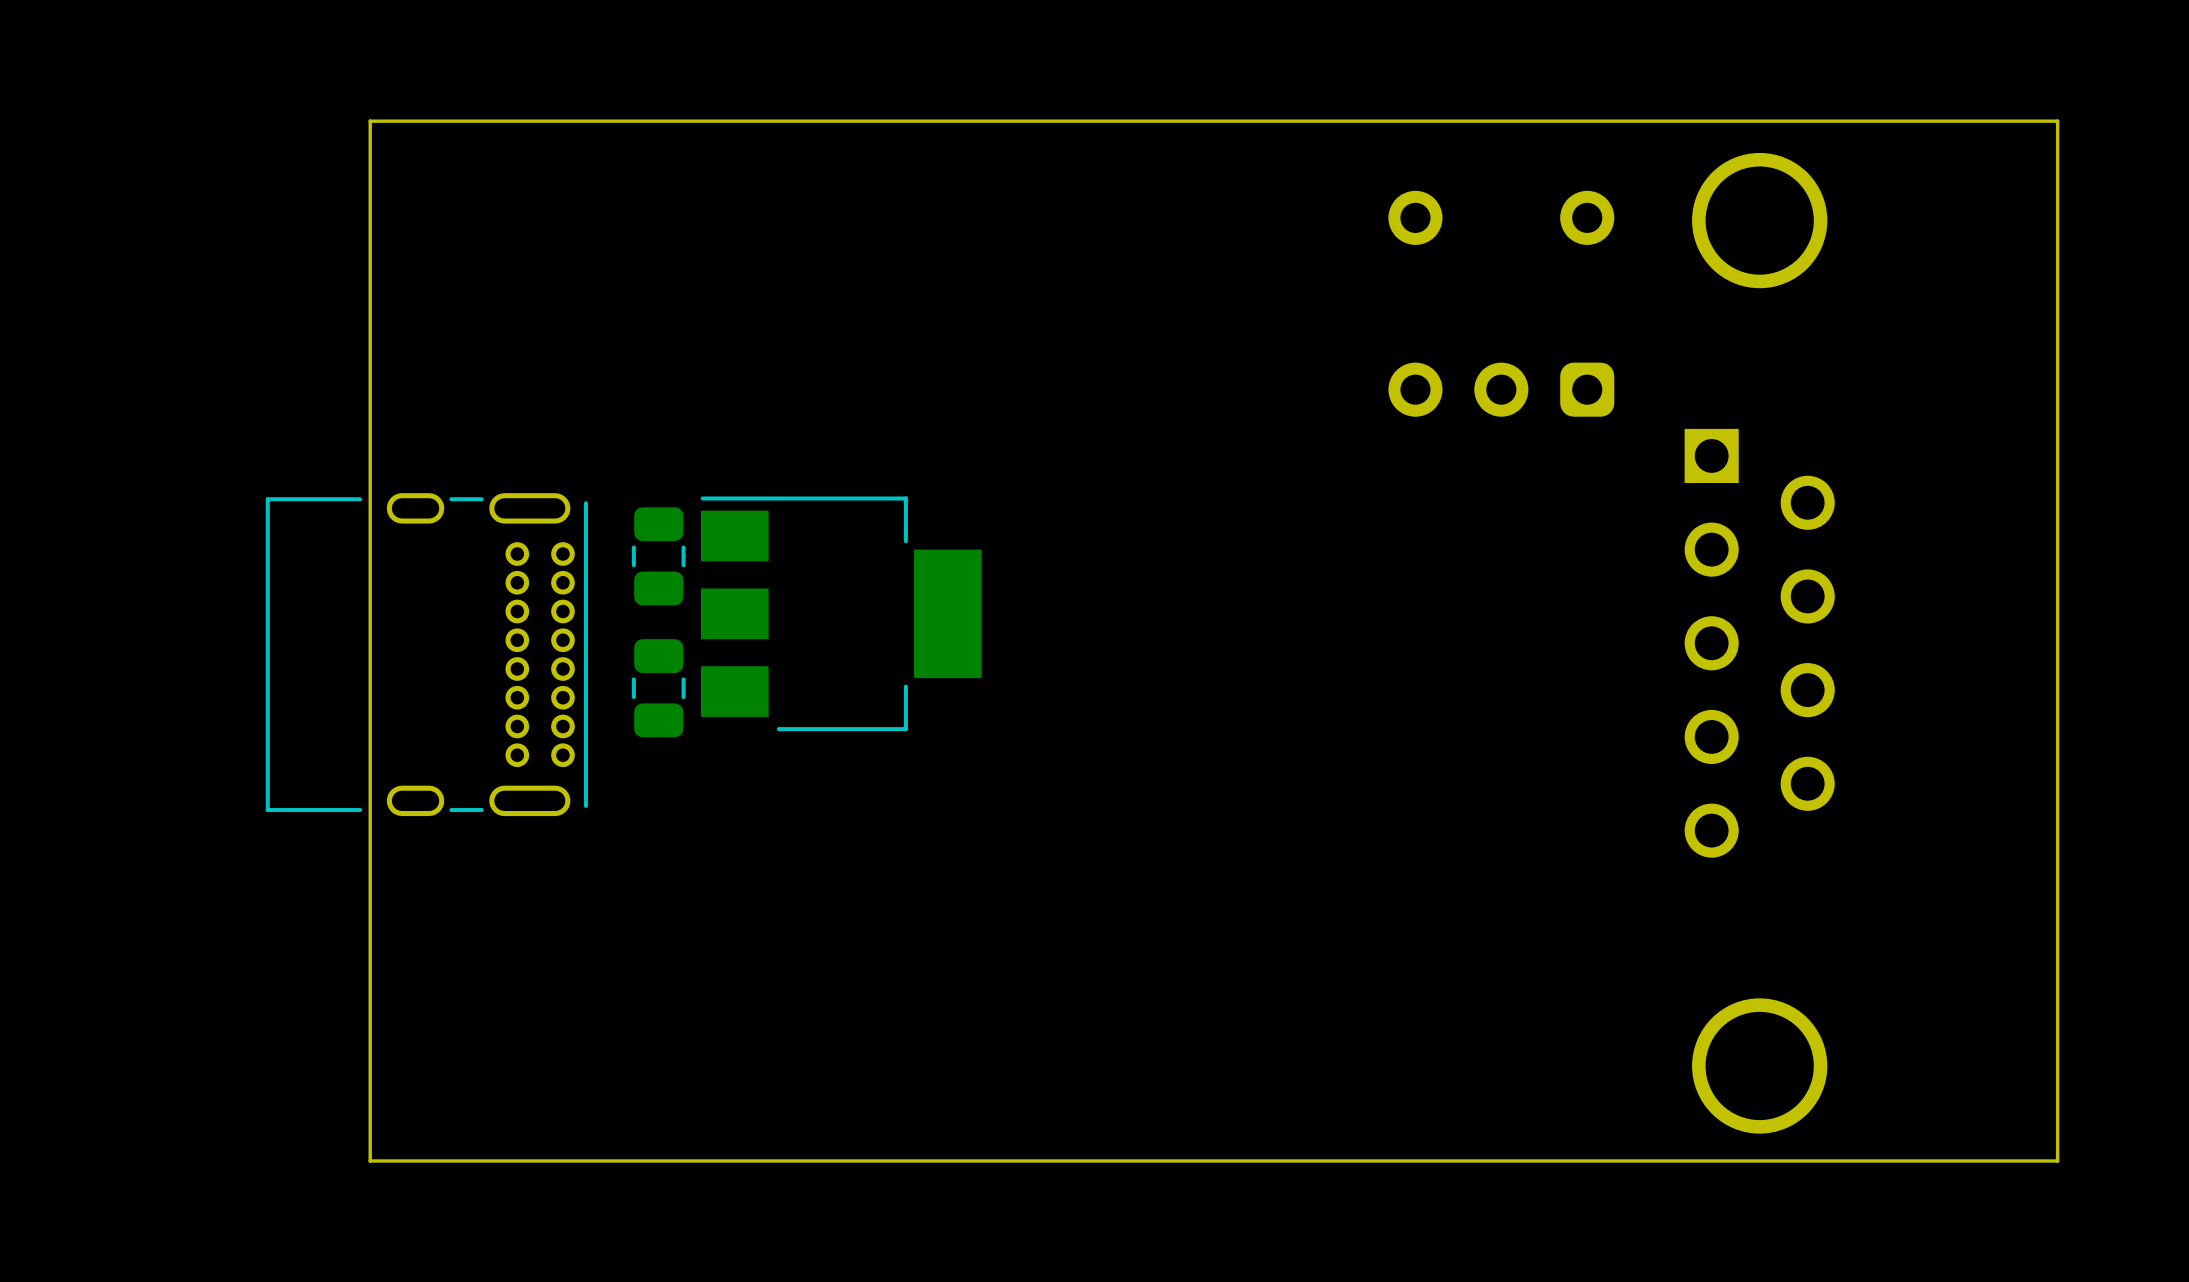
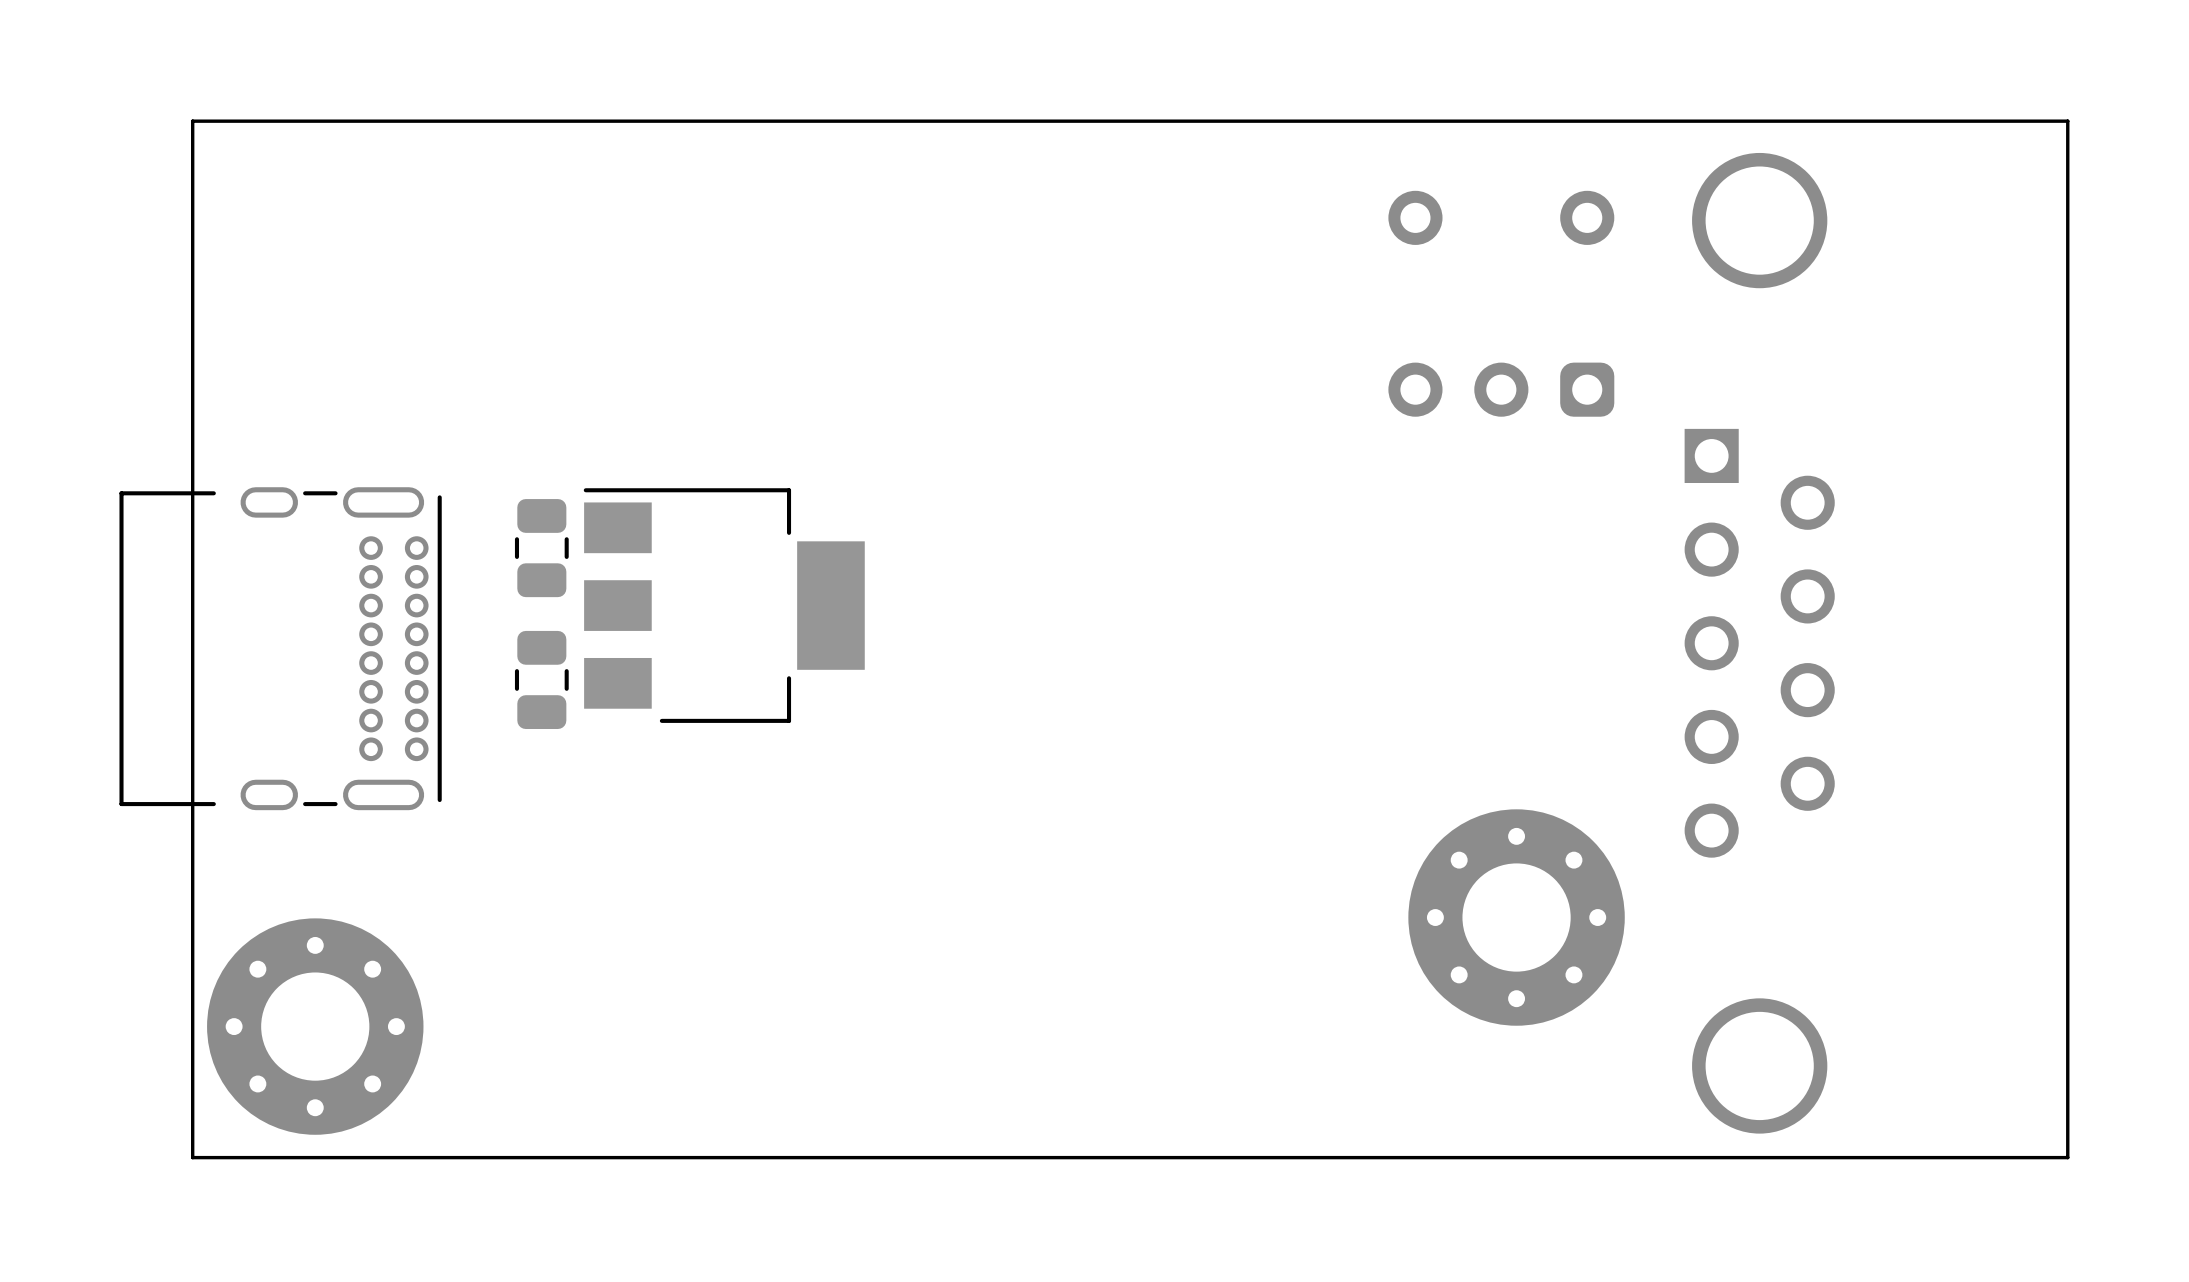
board edge: (2057, 121) (2057, 1160) (370, 1160) (370, 121) -> (2057, 121) (2067, 121) (2067, 1157) (192, 1157) (192, 121) (370, 121)
part: none -> (541, 548)
part: (658, 556) -> none
part position: (841, 613) -> (724, 605)
part position: (426, 654) -> (280, 648)
part: none -> (541, 679)
part: (658, 688) -> none
part: none -> (1516, 917)
part: none -> (315, 1026)

